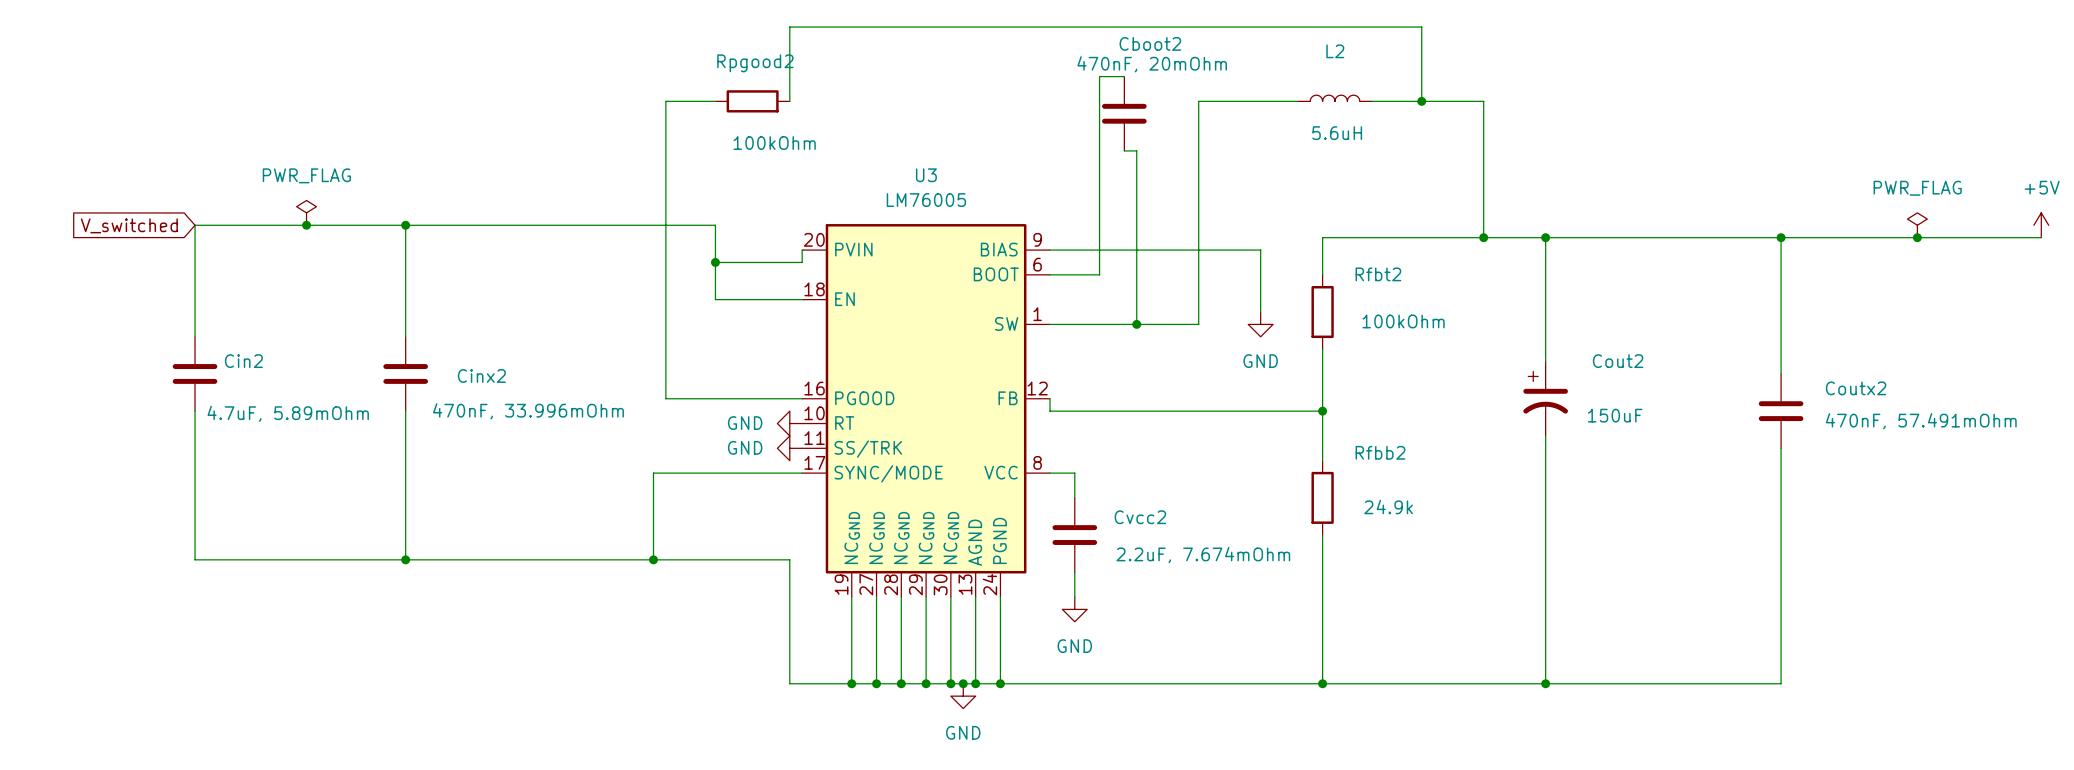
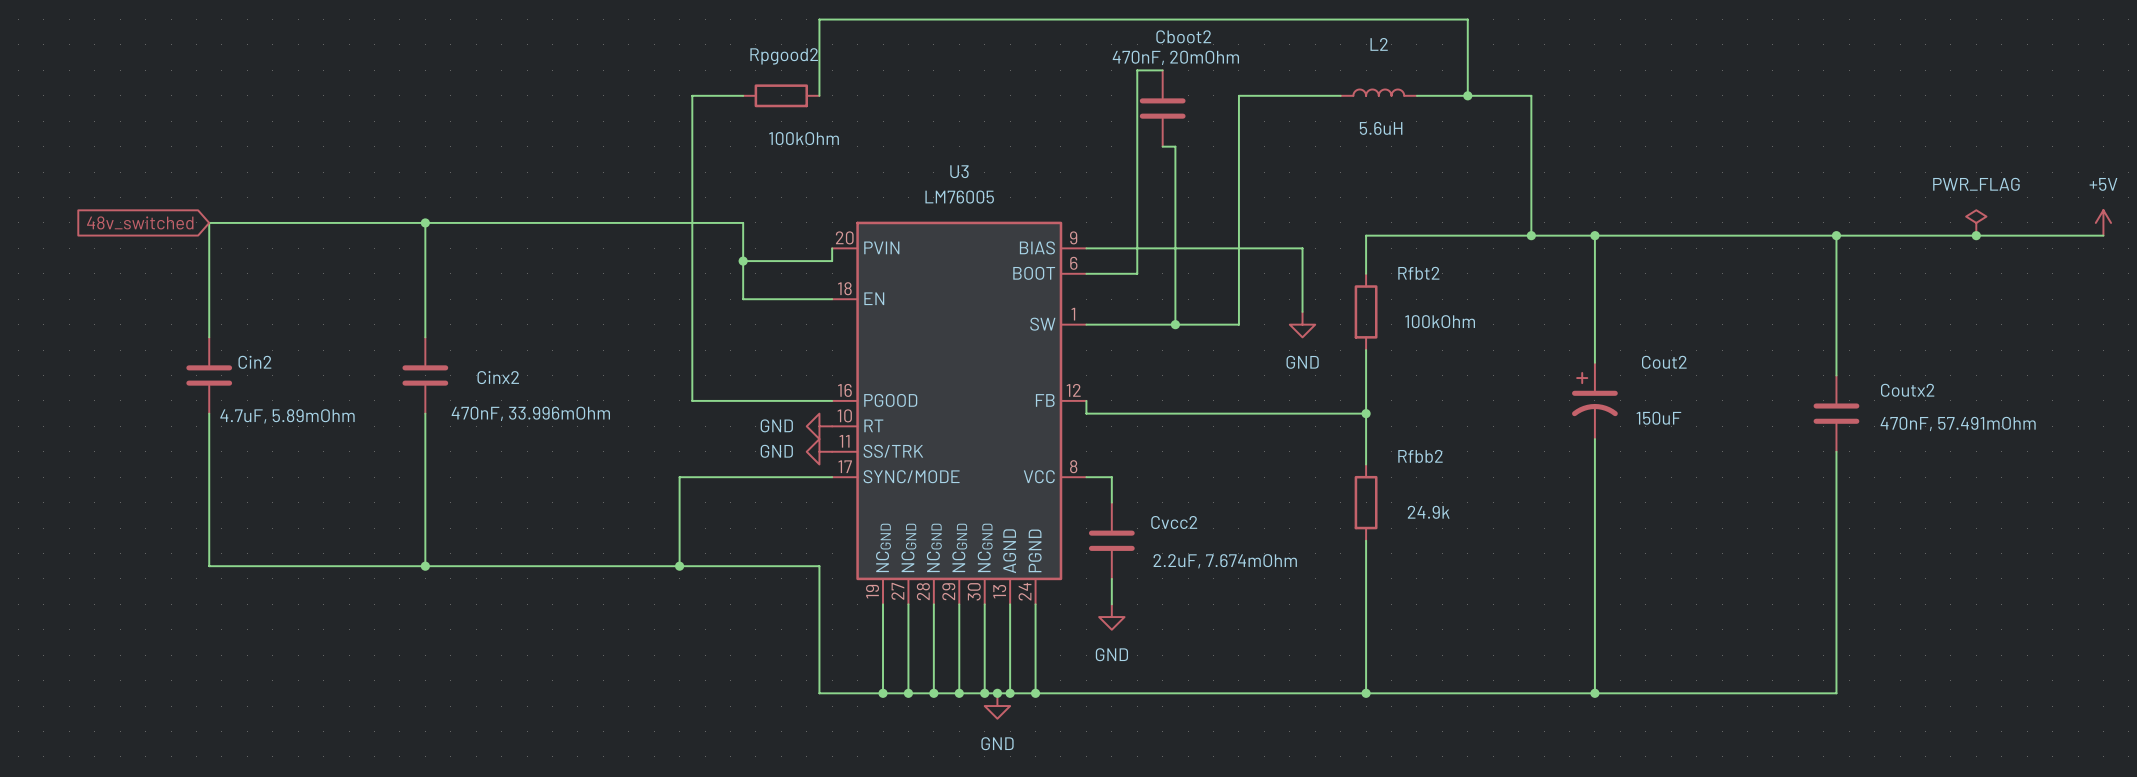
power symbol: PWR_FLAG (306, 212) -> none
global label: V_switched (129, 225) -> 48v_switched (140, 222)
junction: (306, 225) -> none

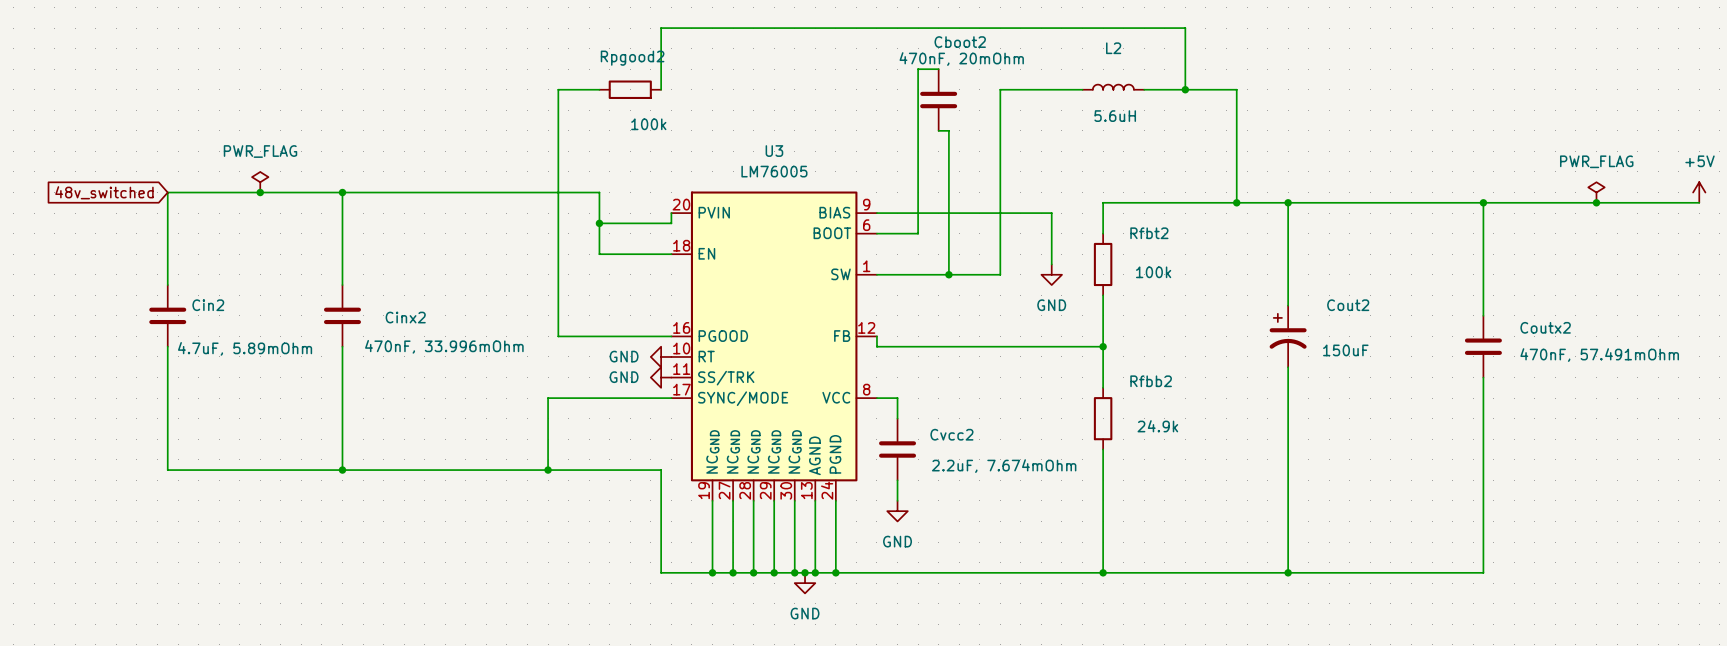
Rpgood2 value: 100kOhm (804, 138) -> 100k (648, 124)
power symbol: none -> PWR_FLAG (260, 182)
junction: none -> (260, 192)
Rfbt2 value: 100kOhm (1440, 321) -> 100k (1153, 272)

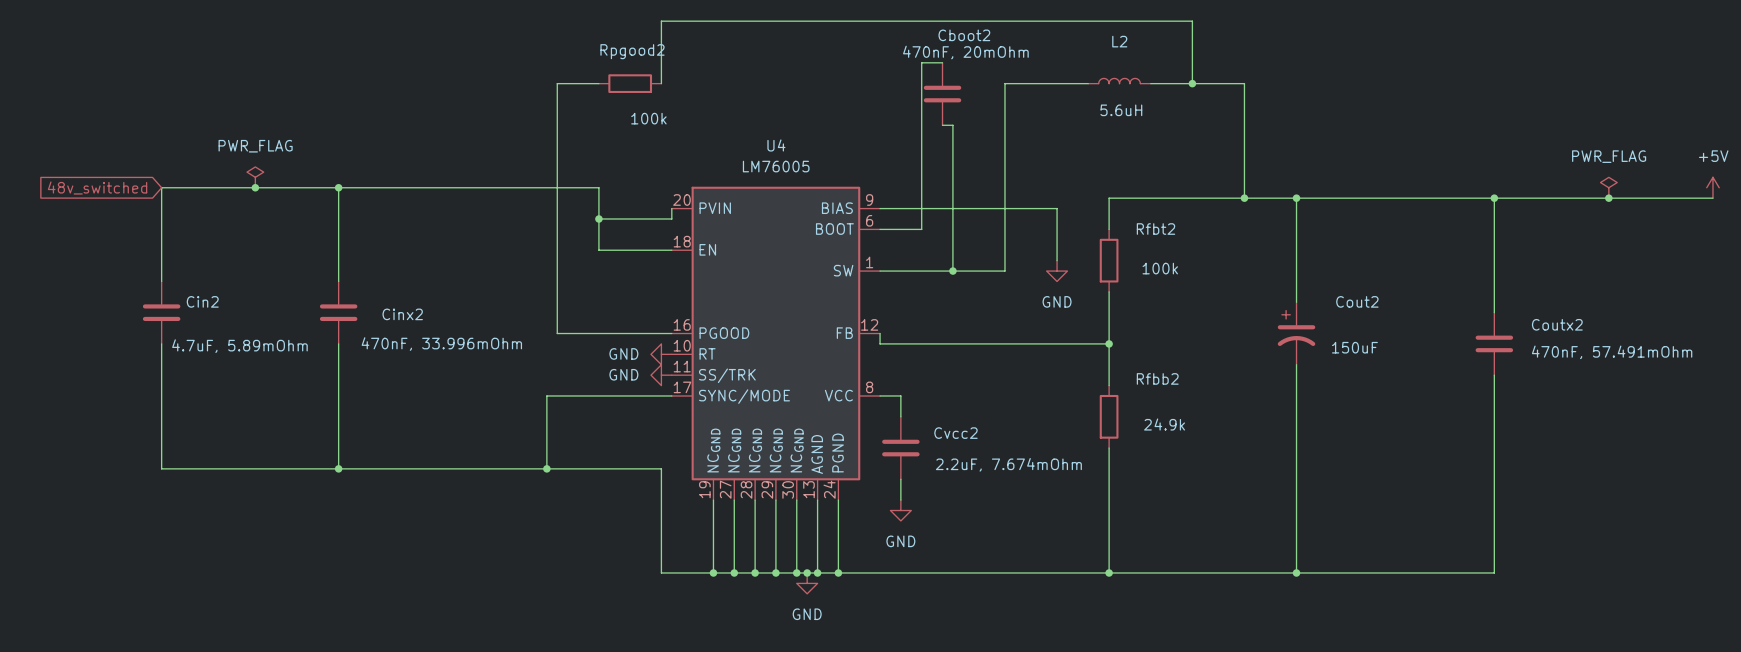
U3 name: U3 (774, 151) -> U4 (776, 145)

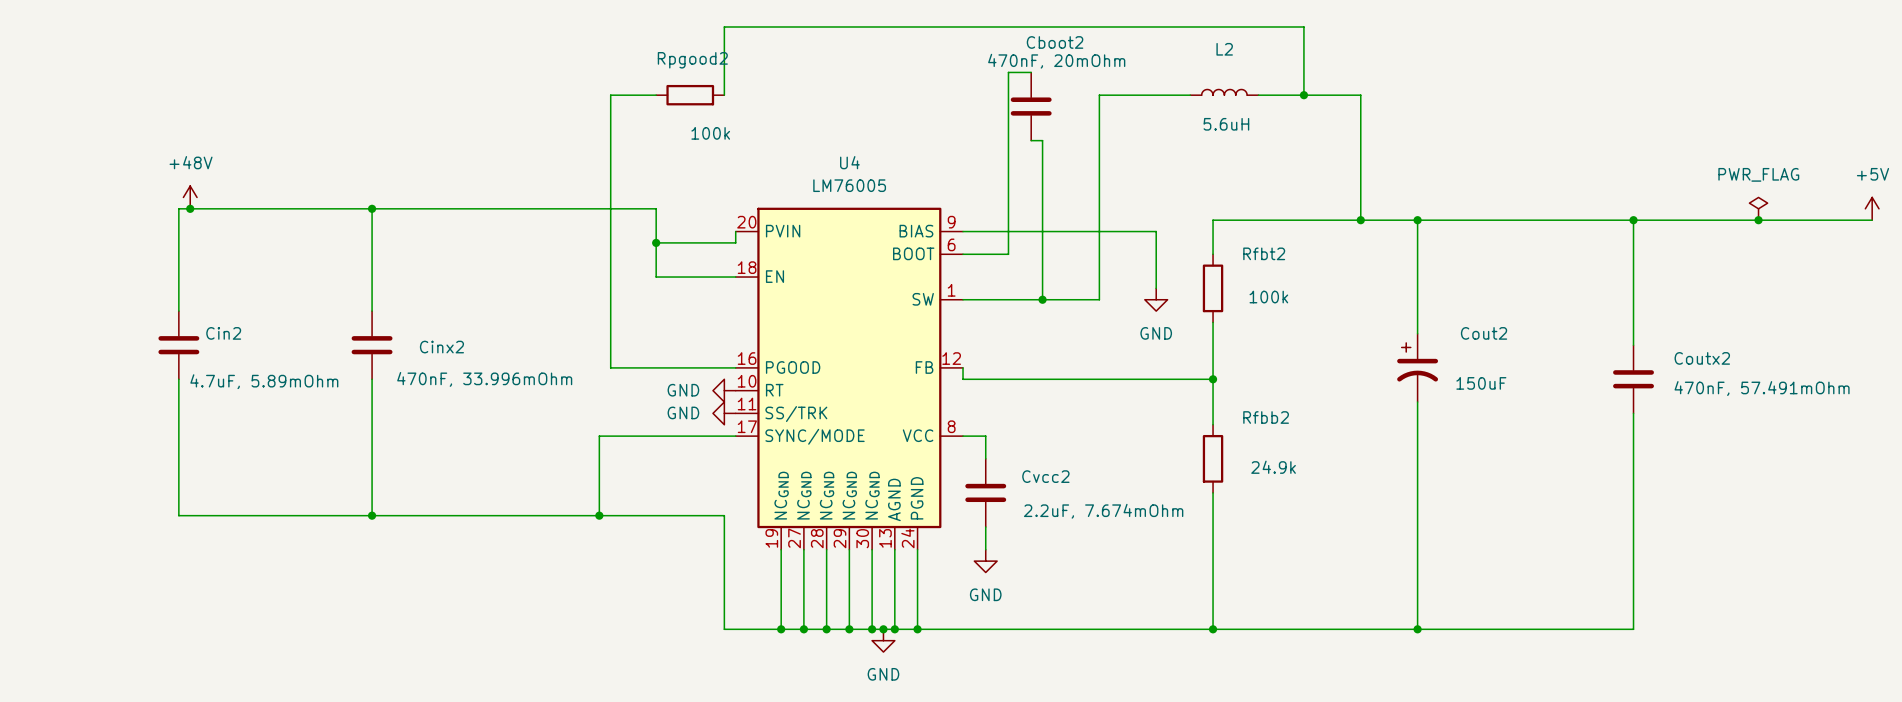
power symbol: none -> +48V (190, 197)
power symbol: PWR_FLAG (255, 177) -> none
junction: none -> (190, 208)
junction: (255, 187) -> none
global label: 48v_switched (97, 188) -> none

